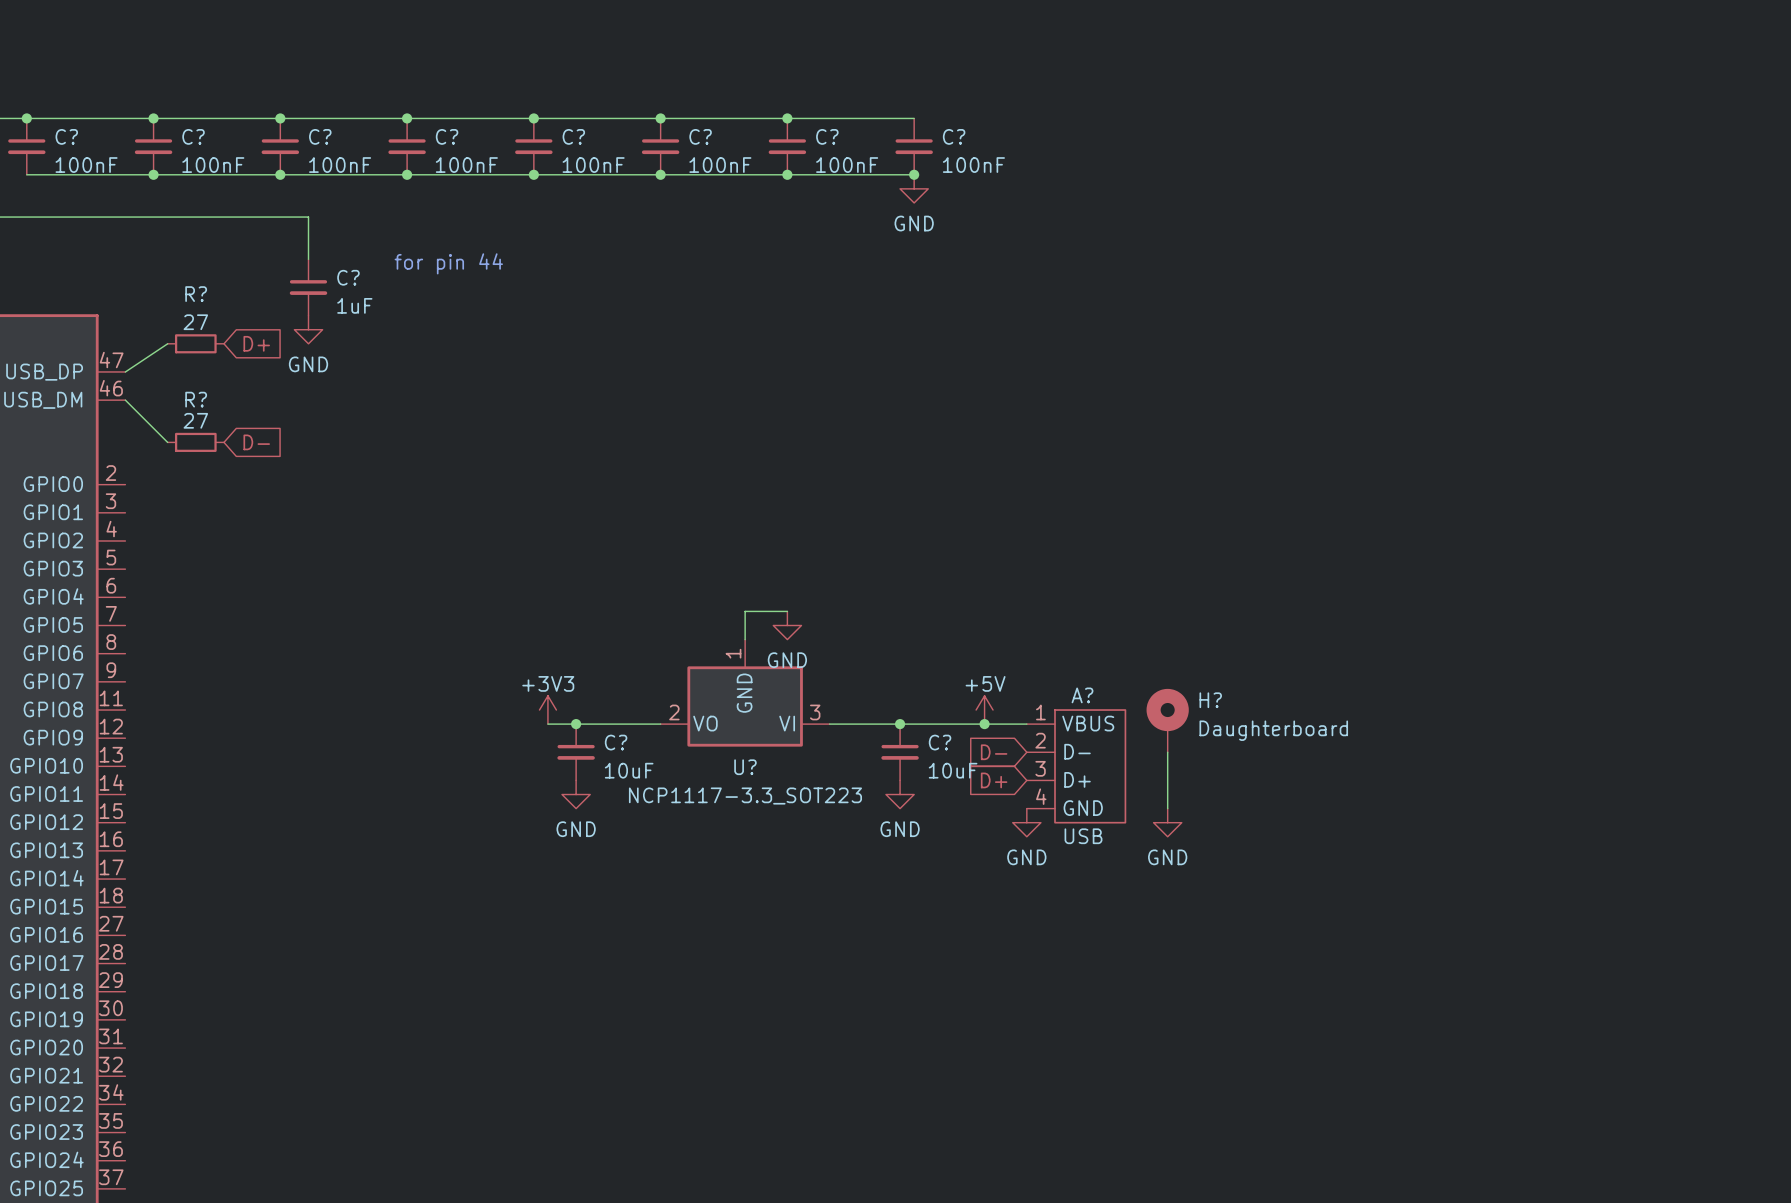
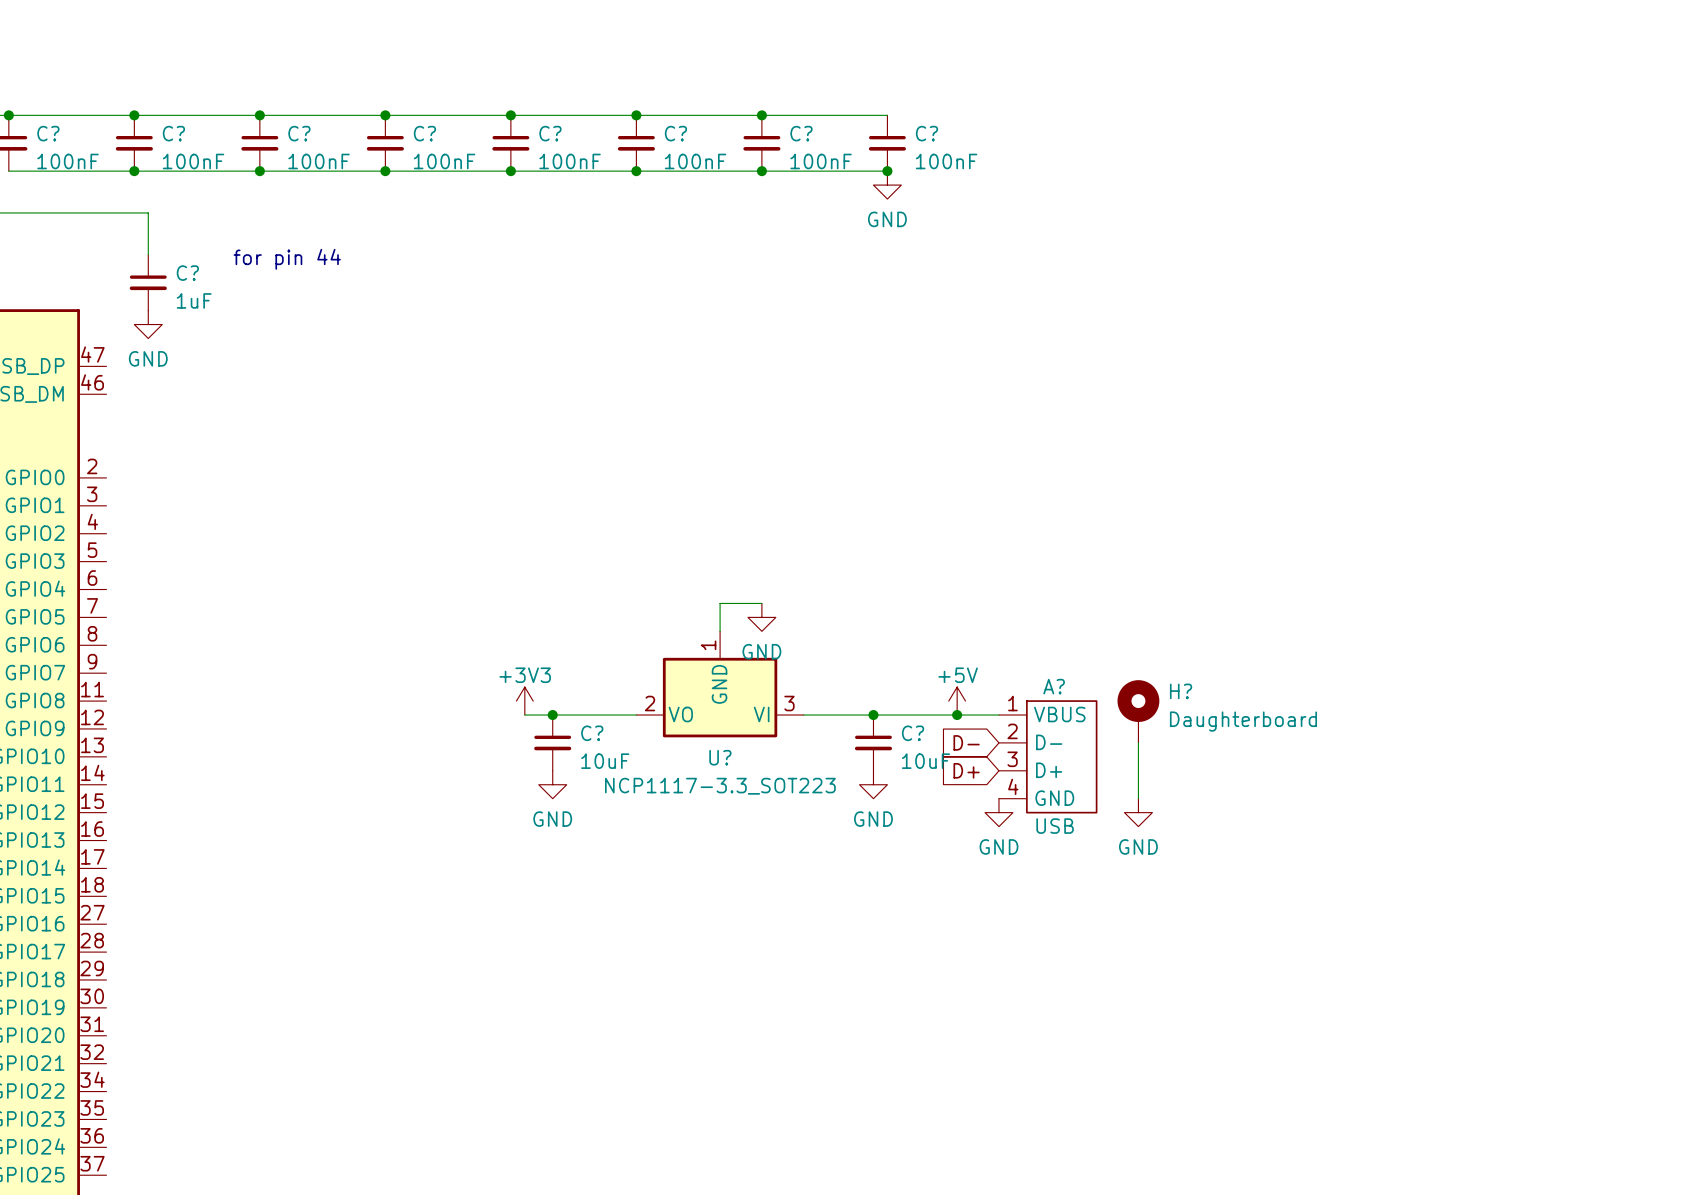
wire: (167, 217) (308, 217) (308, 259) -> (148, 212) (148, 254)
text position: for pin 44 (448, 263) -> for pin 44 (287, 259)
C? position: (308, 287) -> (148, 282)
power symbol position: GND (308, 329) -> GND (148, 324)
wire: (167, 343) (125, 371) -> none
R?: 27 (195, 343) -> none
global label: D+ (256, 343) -> none
wire: (125, 400) (167, 442) -> none
R?: 27 (195, 442) -> none
global label: D- (256, 442) -> none

